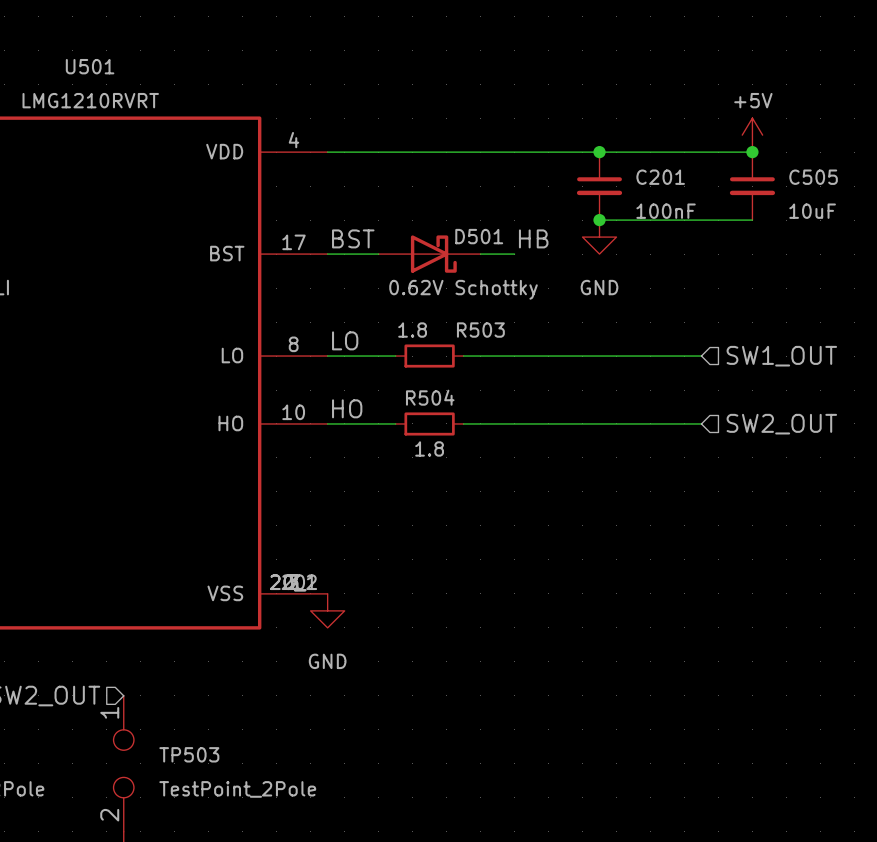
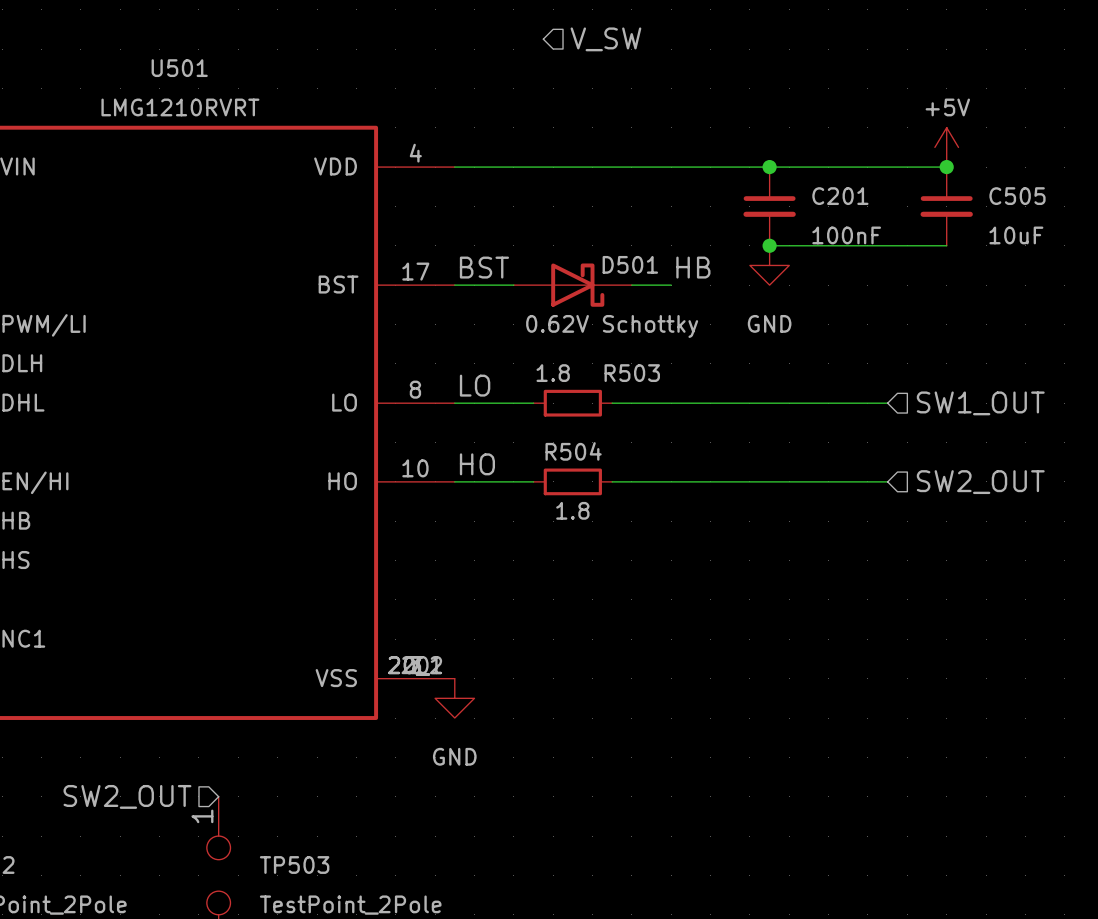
hierarchical label: none -> V_SW (605, 39)

